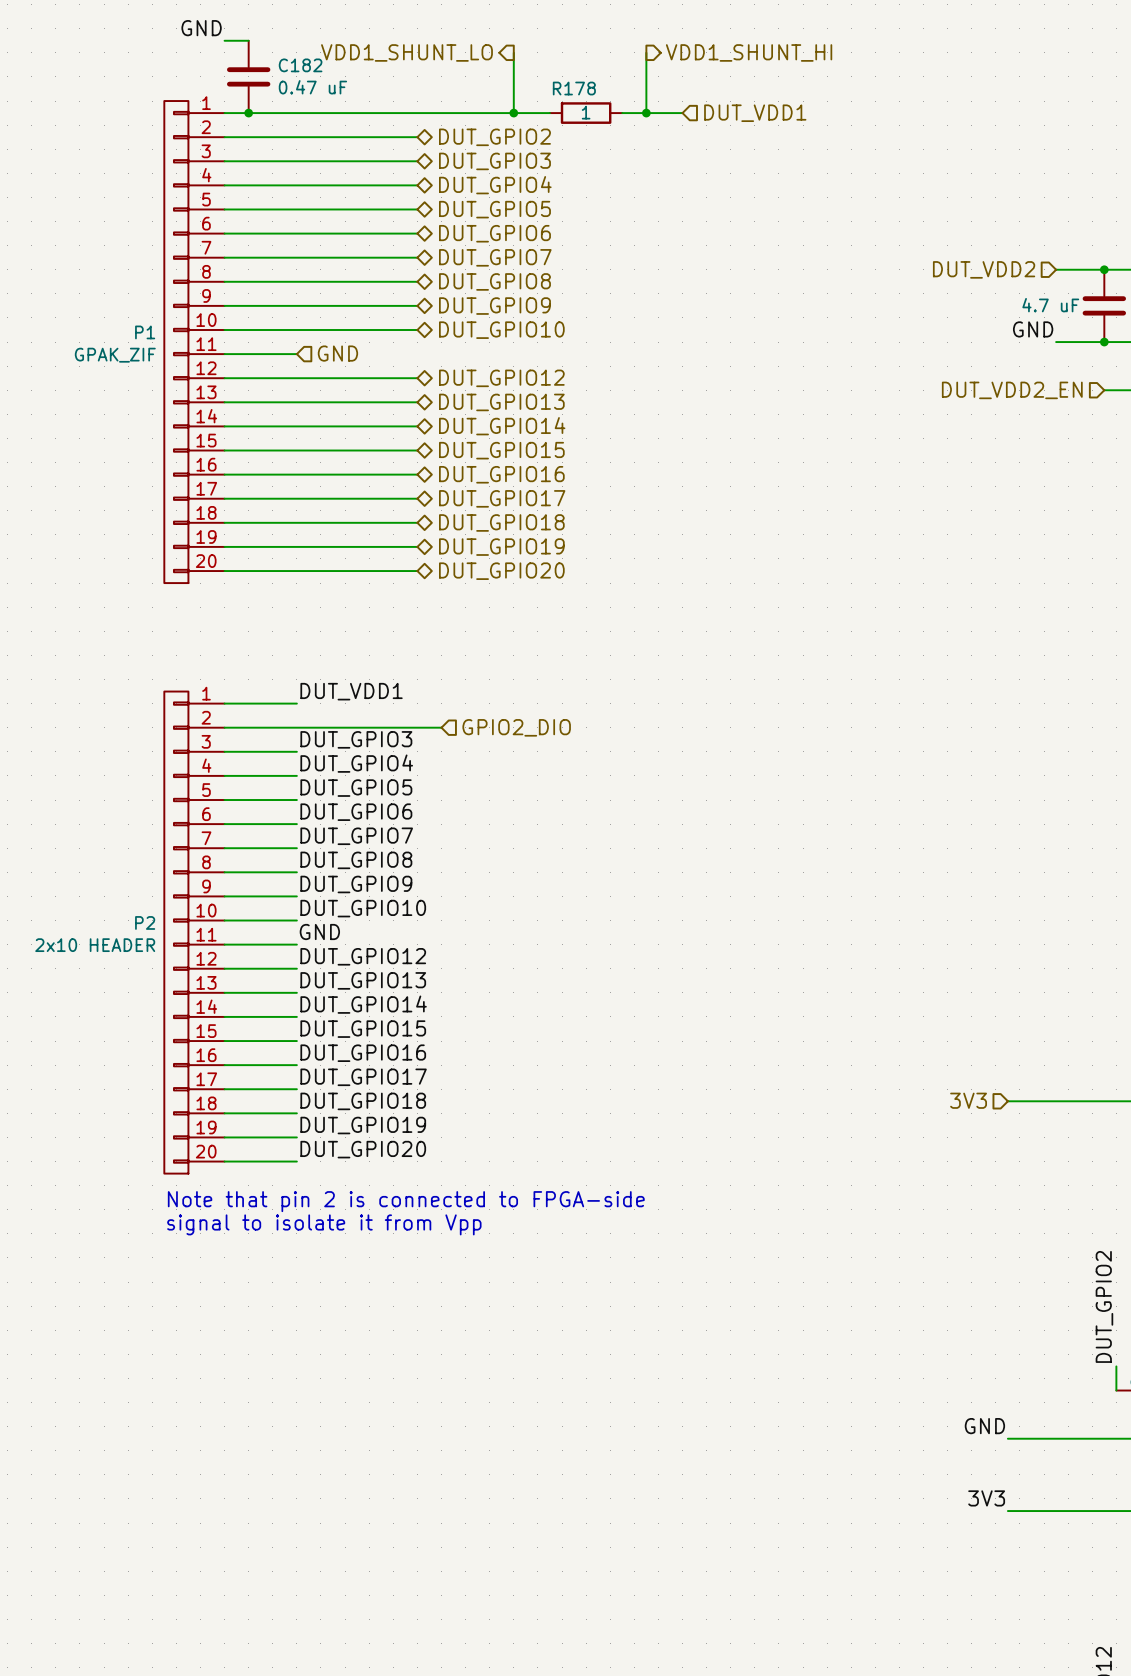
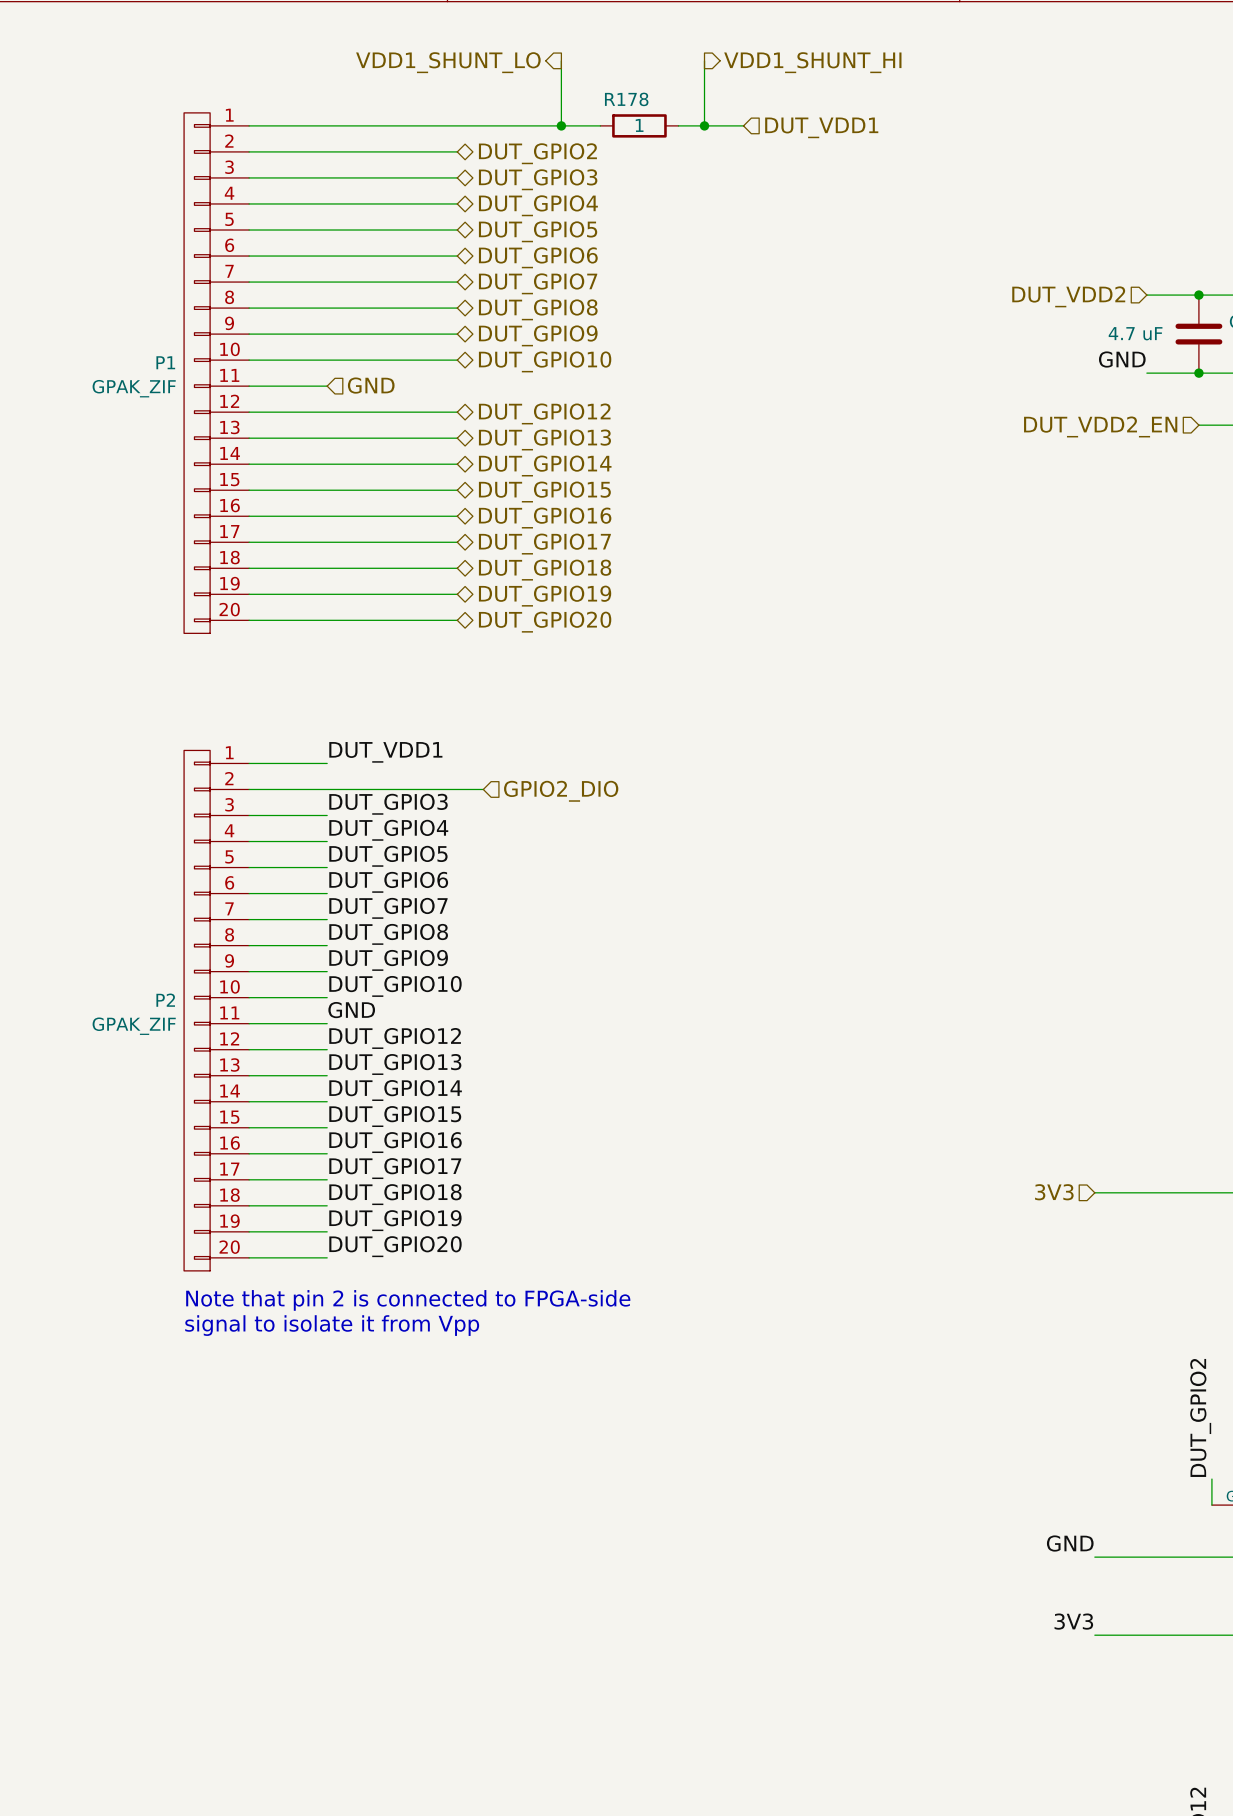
label: GND (201, 28) -> none
wire: (224, 40) (248, 40) -> none
C182: 0.47 uF (248, 76) -> none
junction: (248, 113) -> none
P2 value: 2x10 HEADER (95, 945) -> GPAK_ZIF (134, 1026)

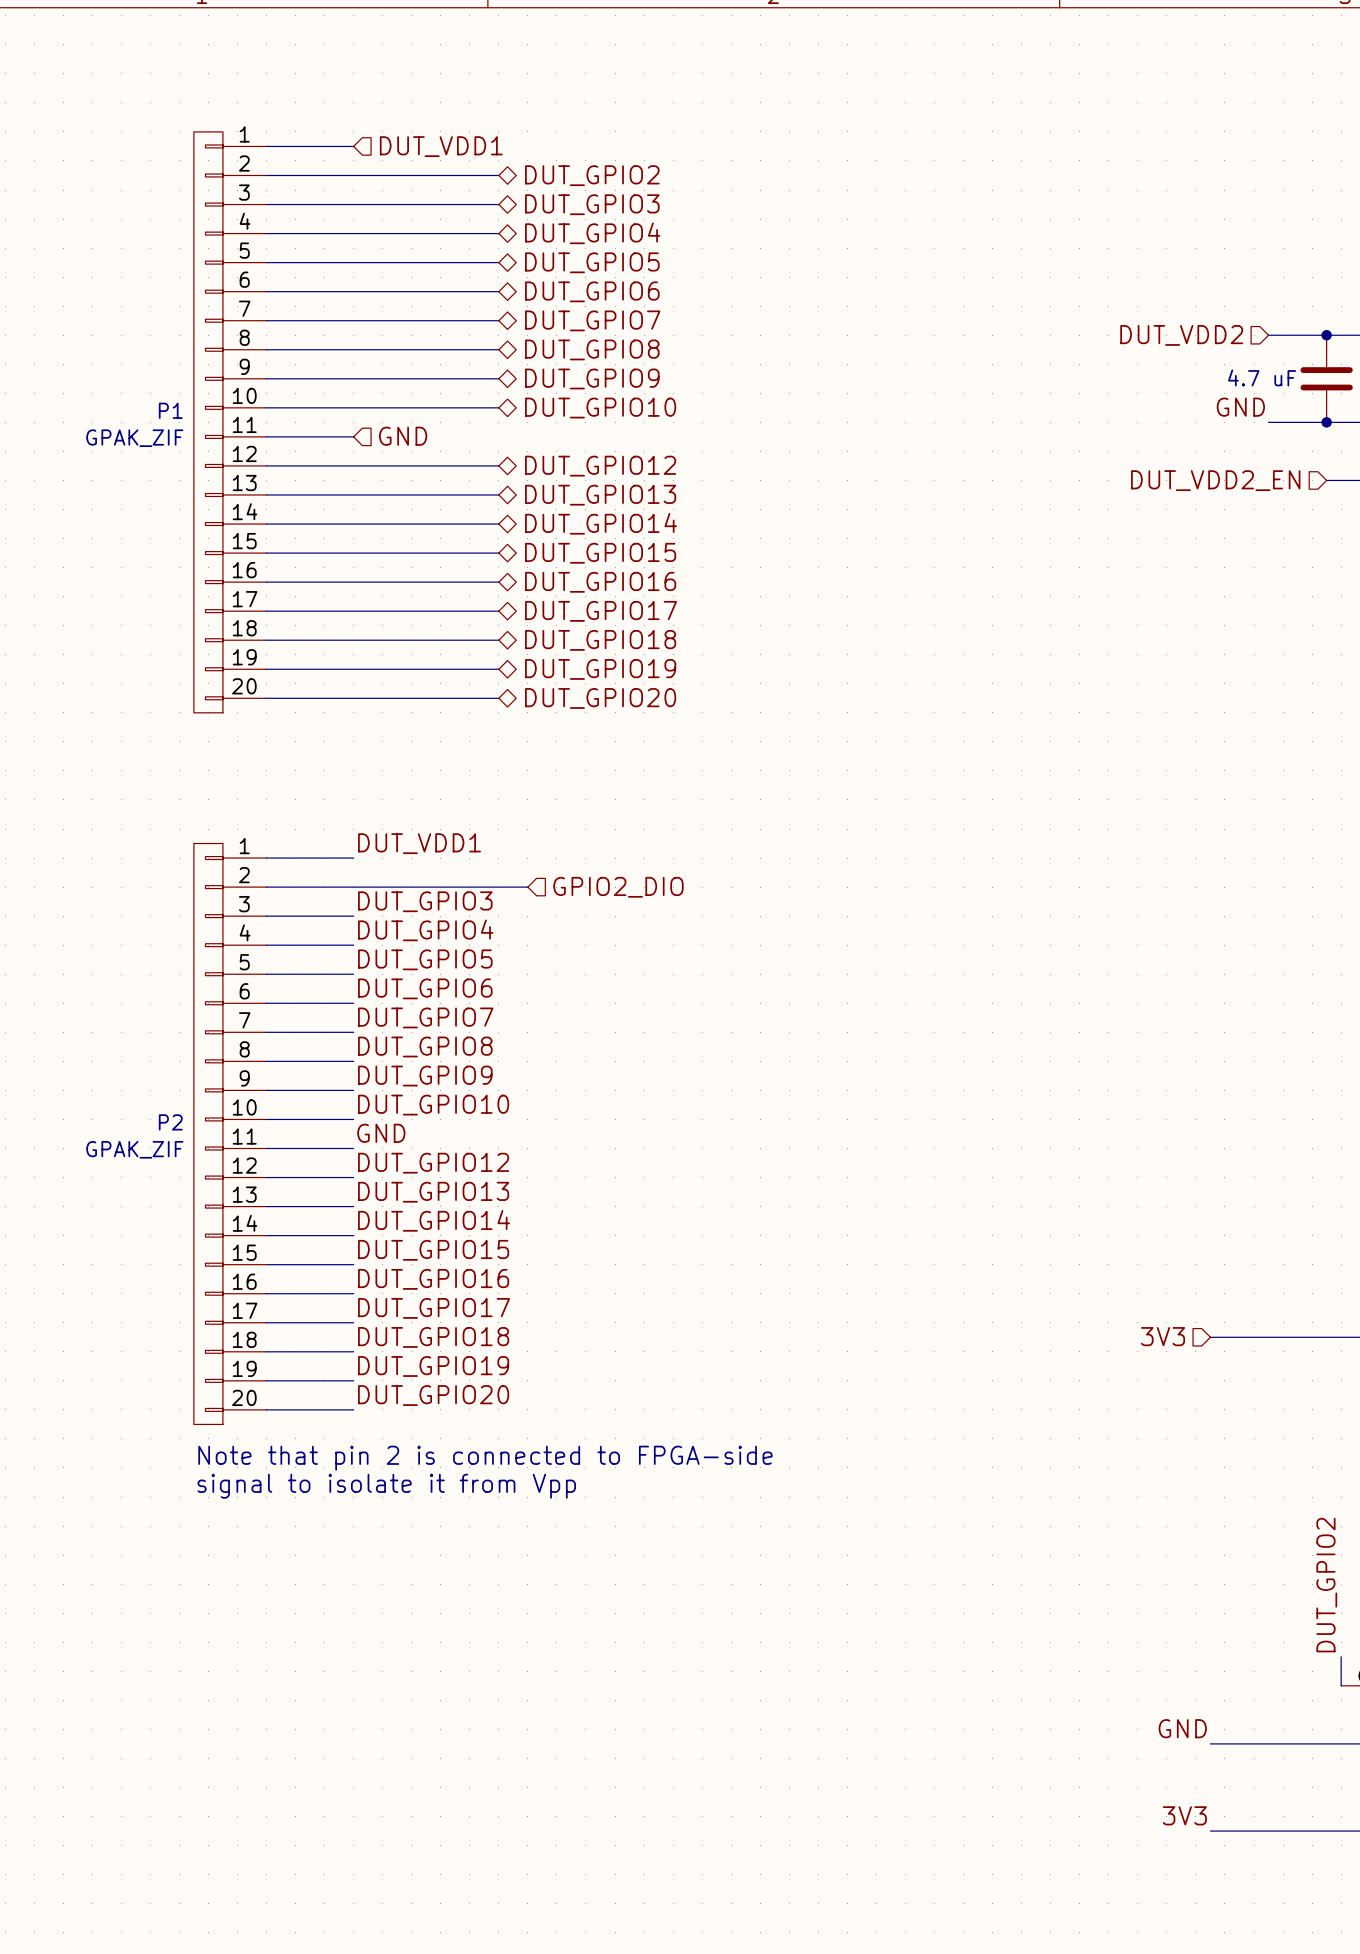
wire: (561, 60) (561, 125) -> none
wire: (704, 60) (704, 125) -> none
hierarchical label: VDD1_SHUNT_LO (448, 62) -> none
hierarchical label: VDD1_SHUNT_HI (812, 62) -> none
wire: (327, 125) (600, 125) -> none
junction: (561, 125) -> none
R178: 1 (639, 125) -> none
wire: (678, 125) (743, 125) -> none
junction: (704, 125) -> none
hierarchical label: none -> DUT_VDD1 (441, 146)
hierarchical label: DUT_VDD1 (821, 127) -> none

